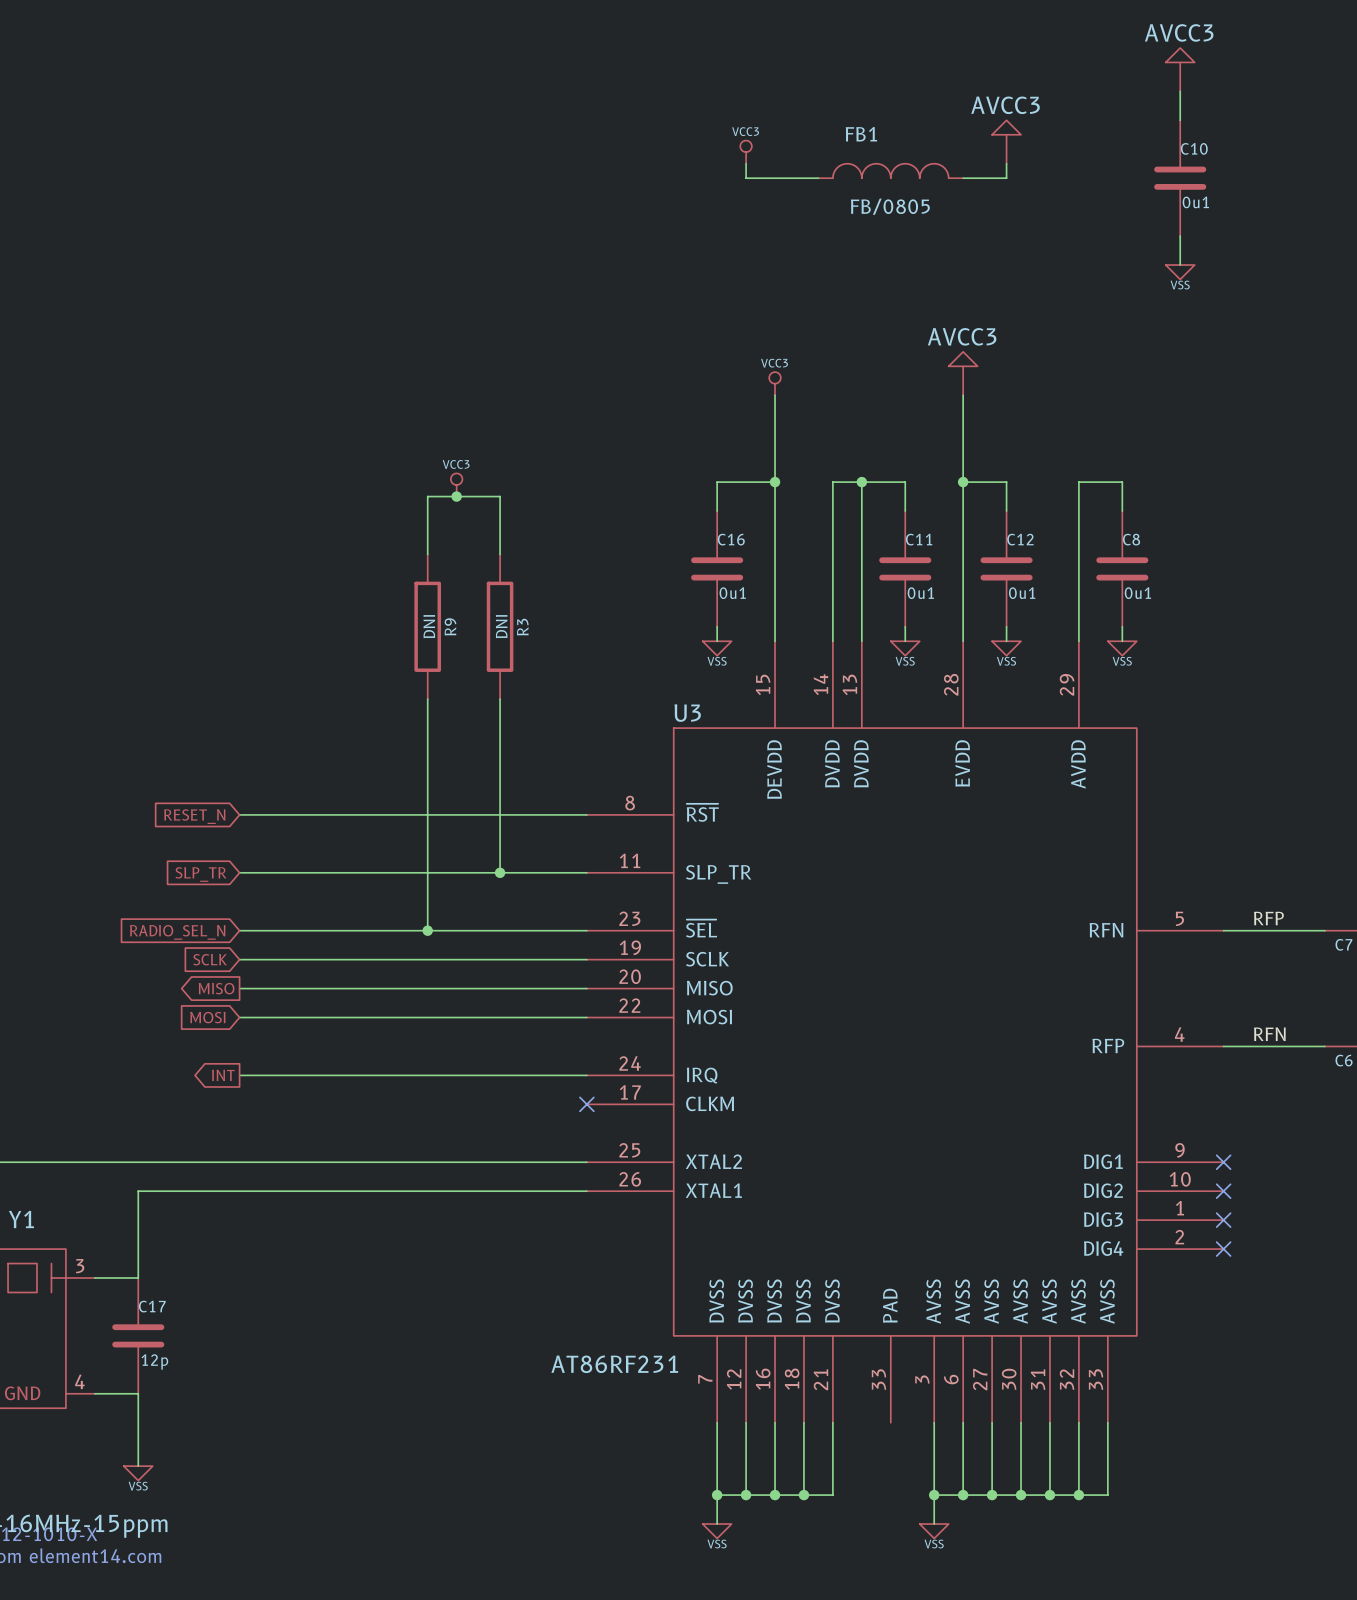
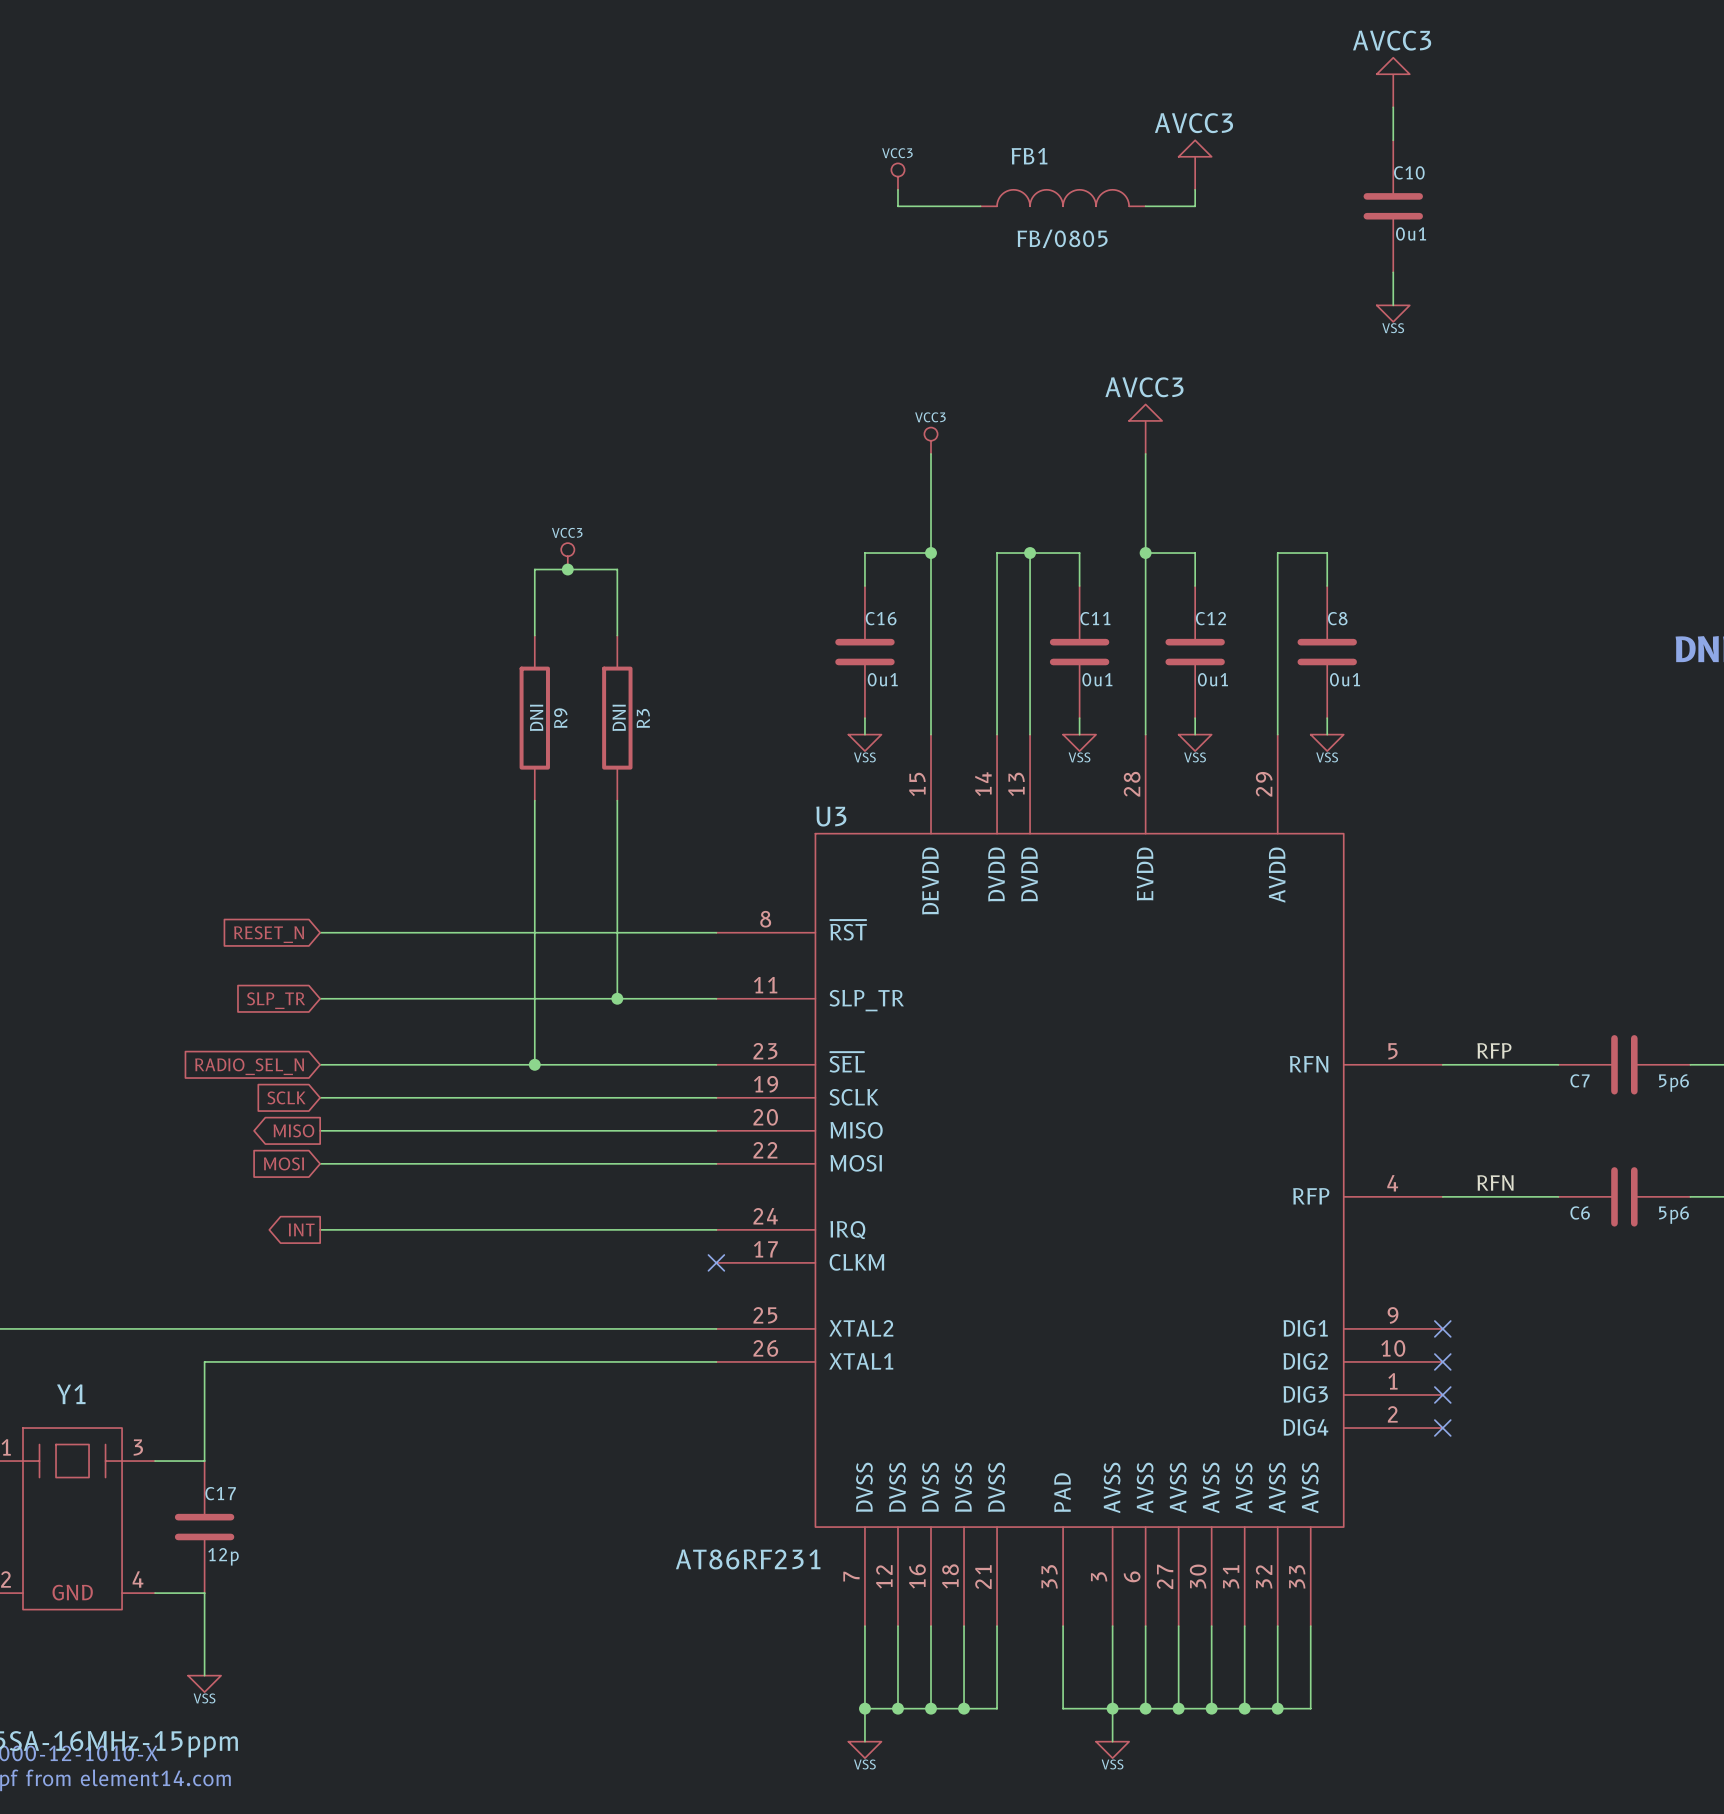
wire: none -> (1063, 1626) (1063, 1708) (1112, 1708)

